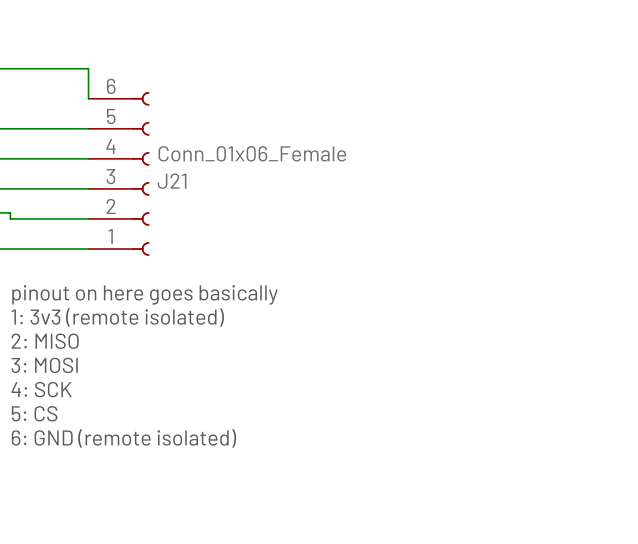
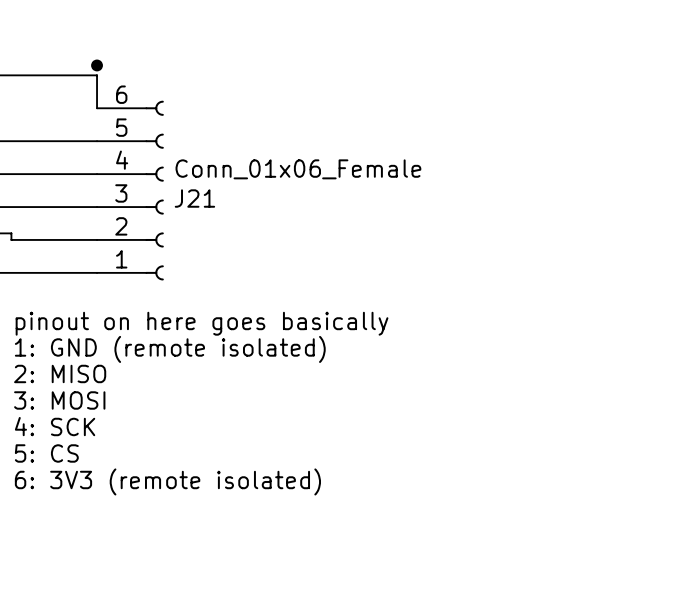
junction: none -> (97, 65)
text: 1: 3v3 (remote isolated) (117, 317) -> 1: GND (remote isolated) (170, 349)
text: 6: GND (remote isolated) (123, 438) -> 6: 3V3 (remote isolated) (167, 481)

